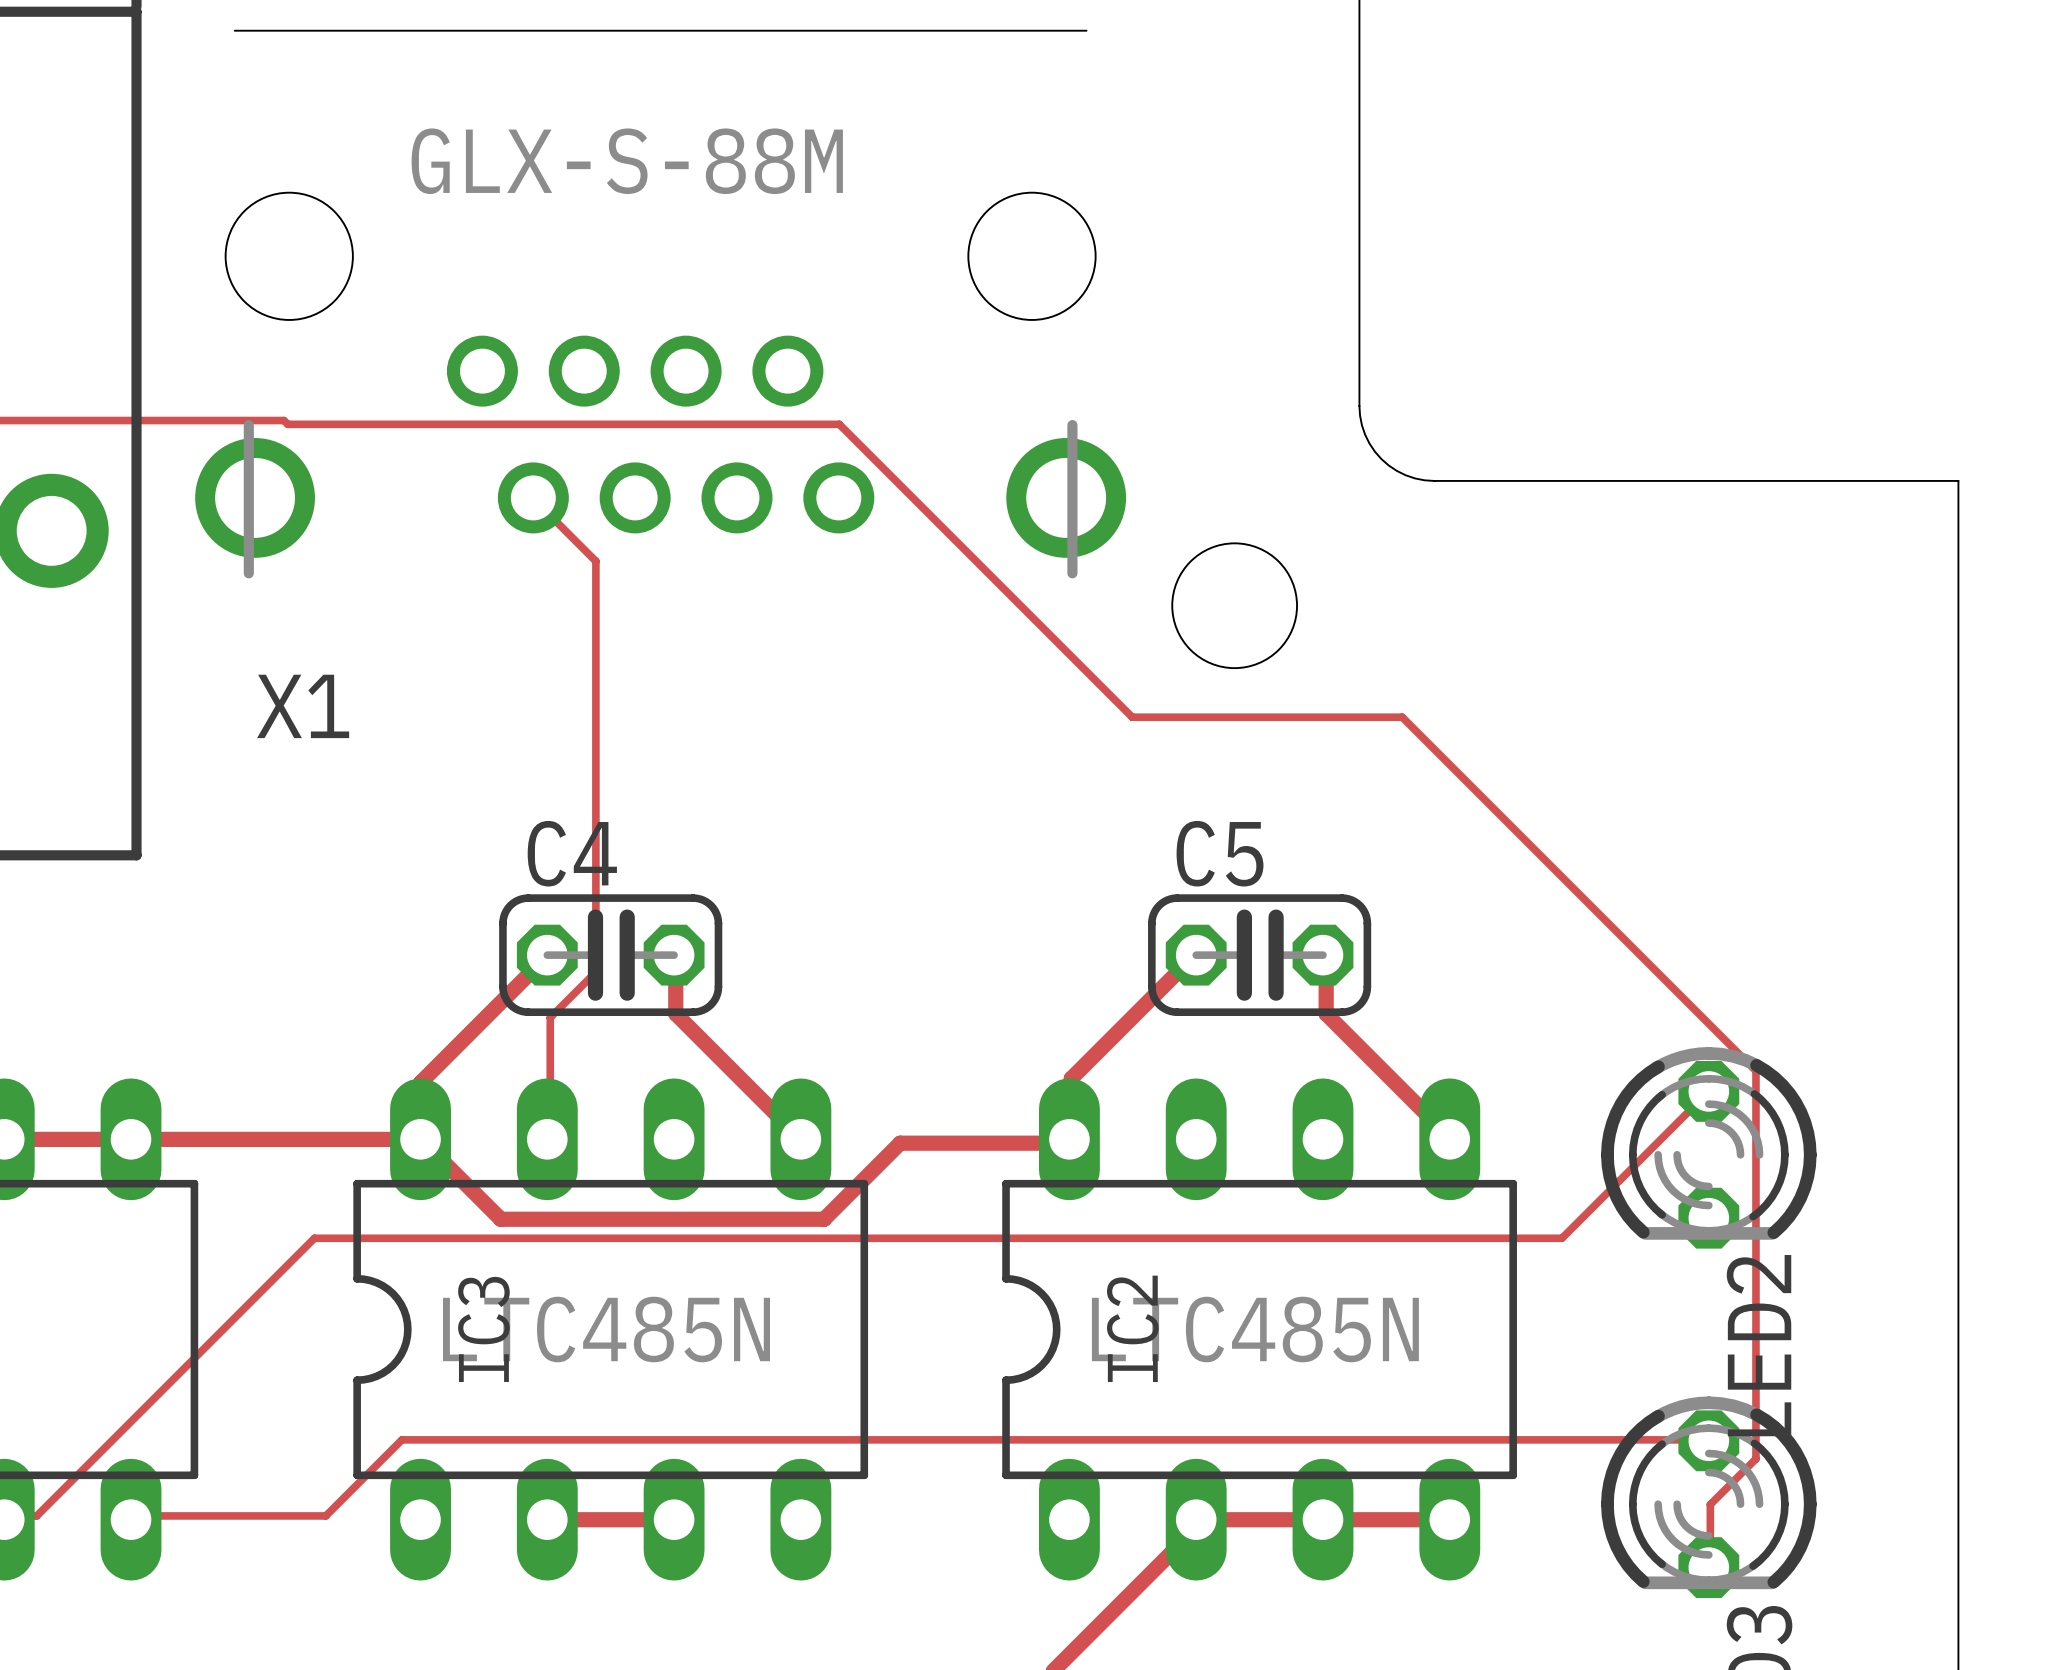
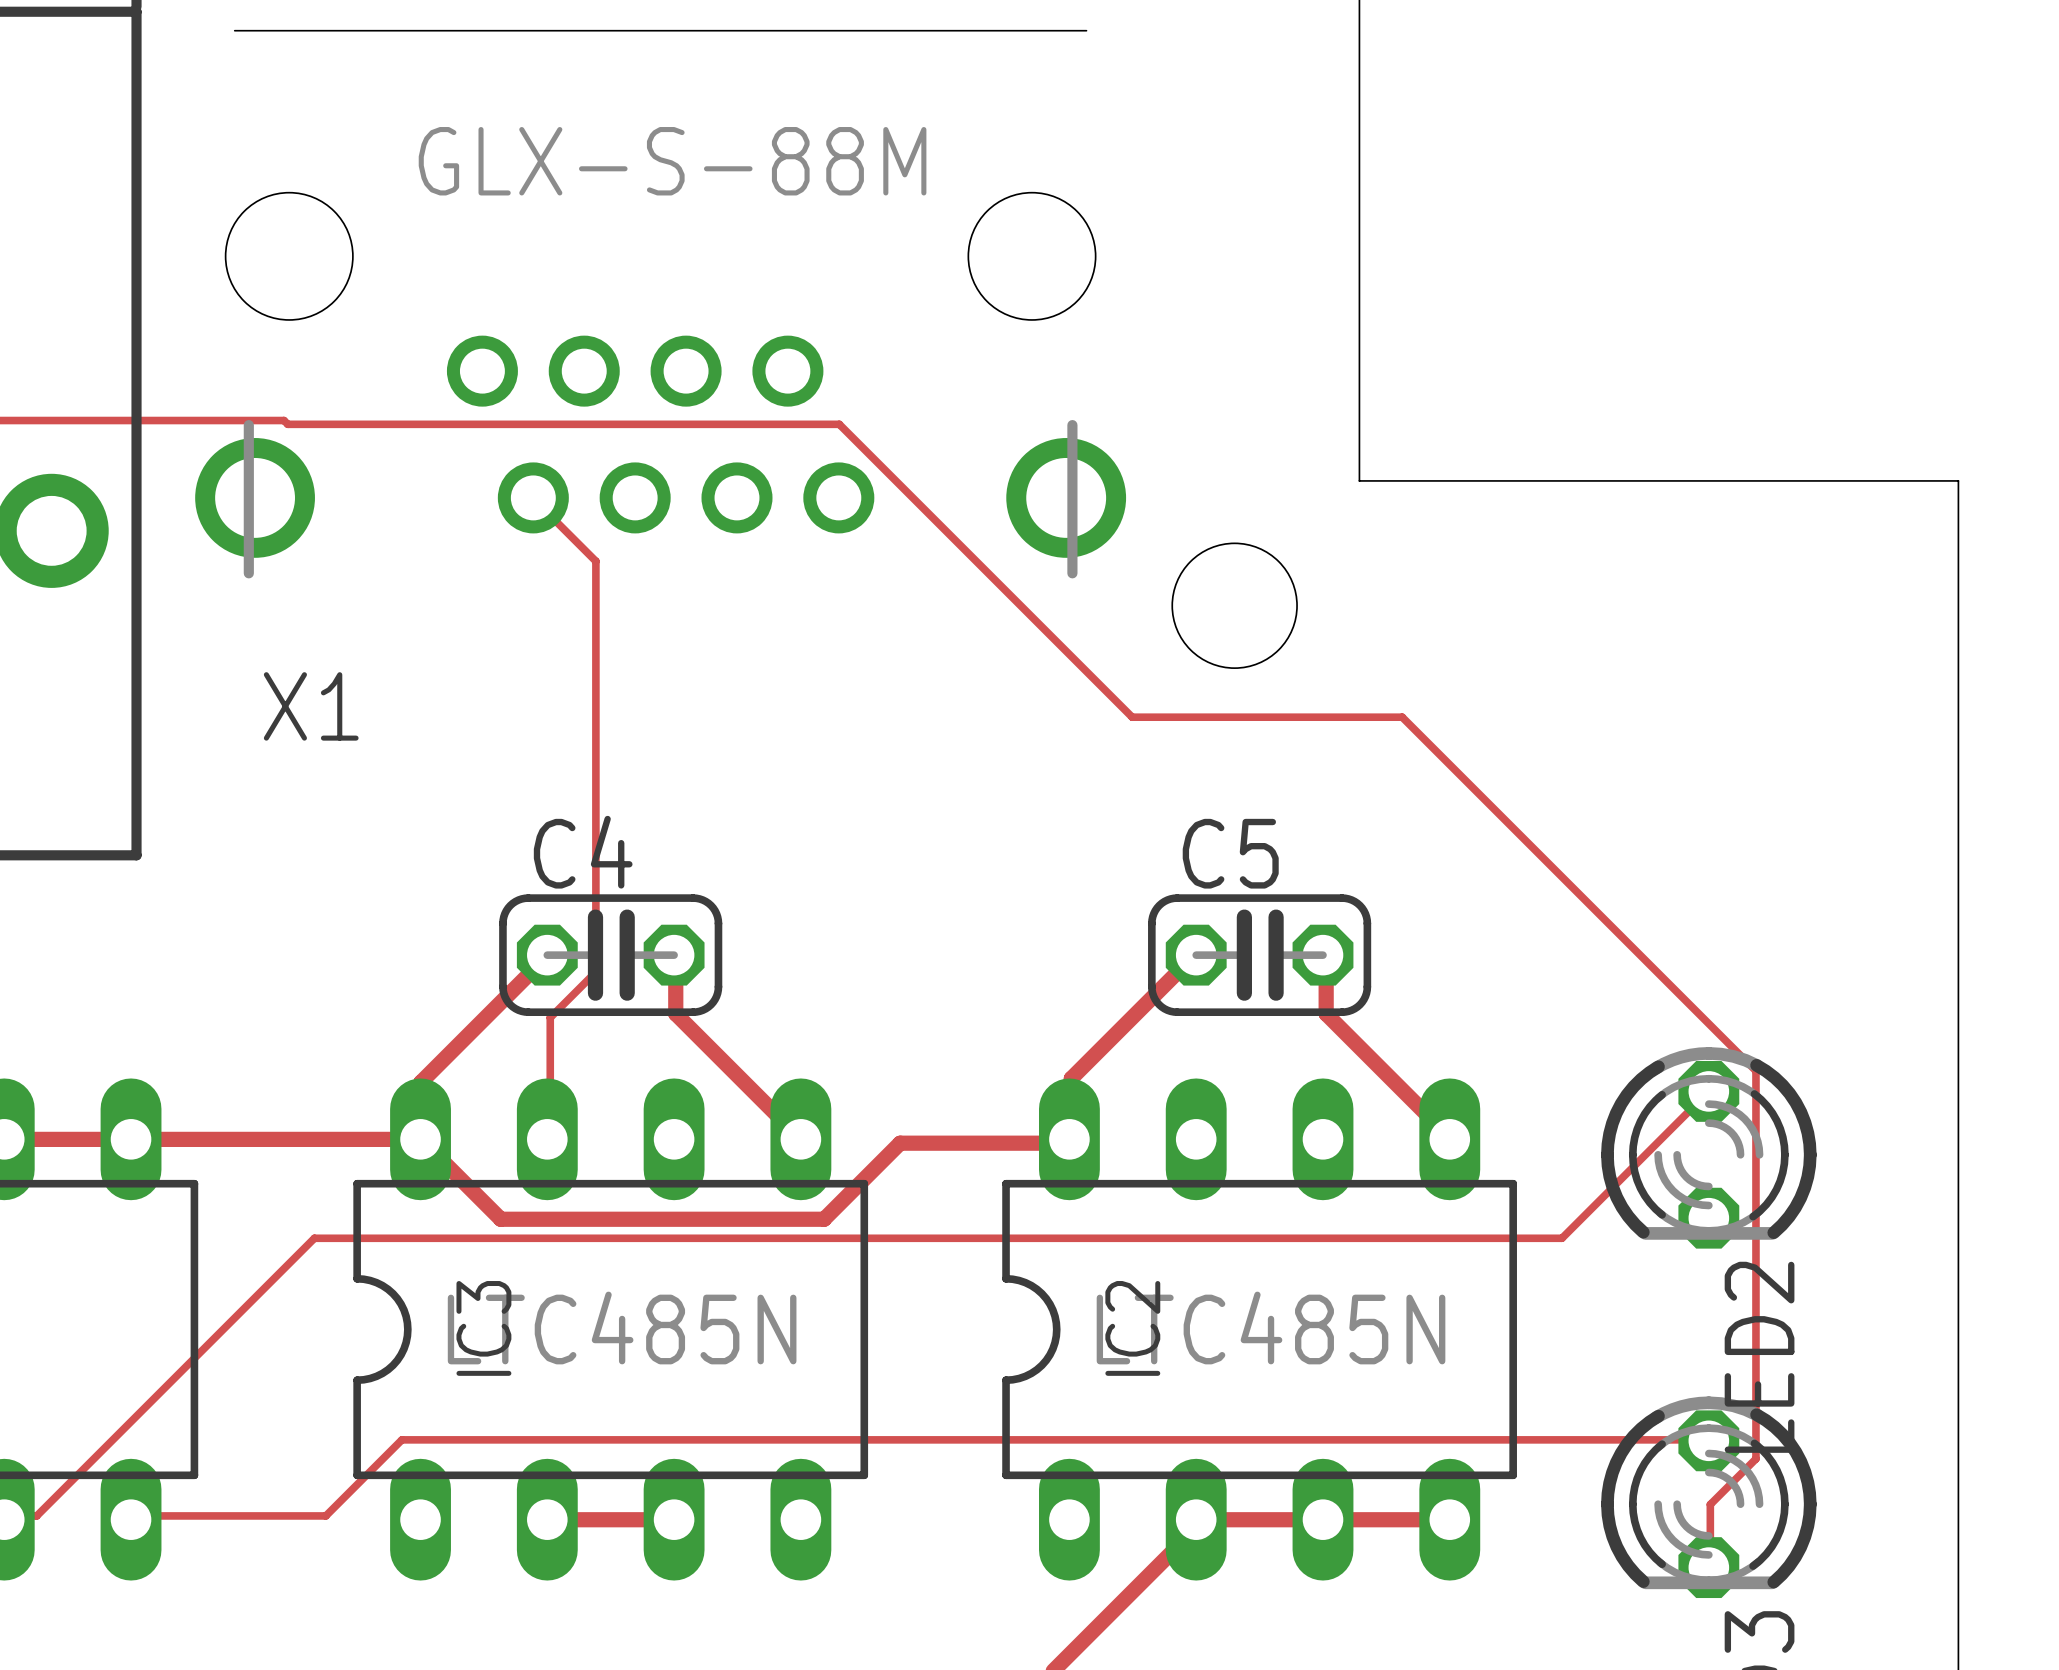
board edge: (1359, 406) (1365, 434) (1381, 459) (1405, 475) (1434, 480) -> (1359, 406) (1359, 480) (1434, 480)

